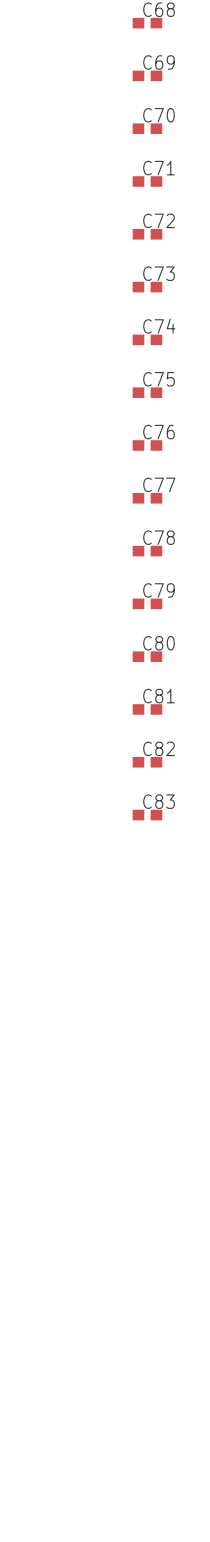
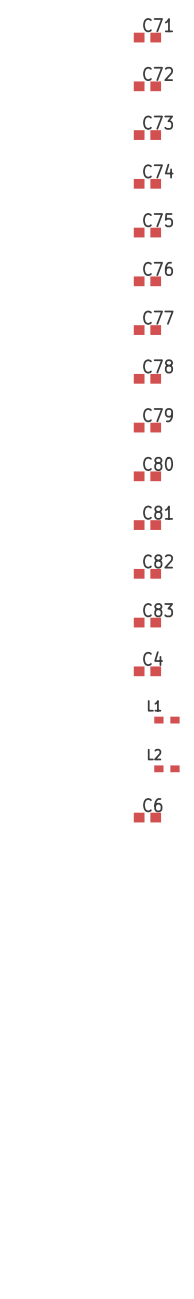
C4: none -> (147, 671)
L1: none -> (166, 720)
L2: none -> (166, 768)
C6: none -> (147, 817)

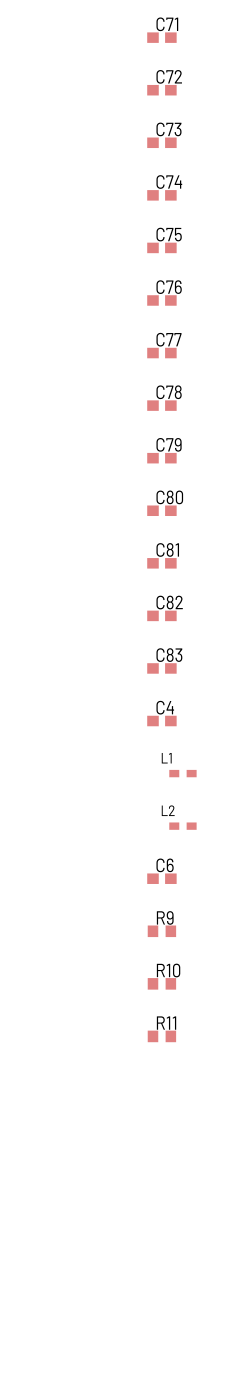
R9: none -> (161, 931)
R10: none -> (161, 983)
R11: none -> (161, 1036)

